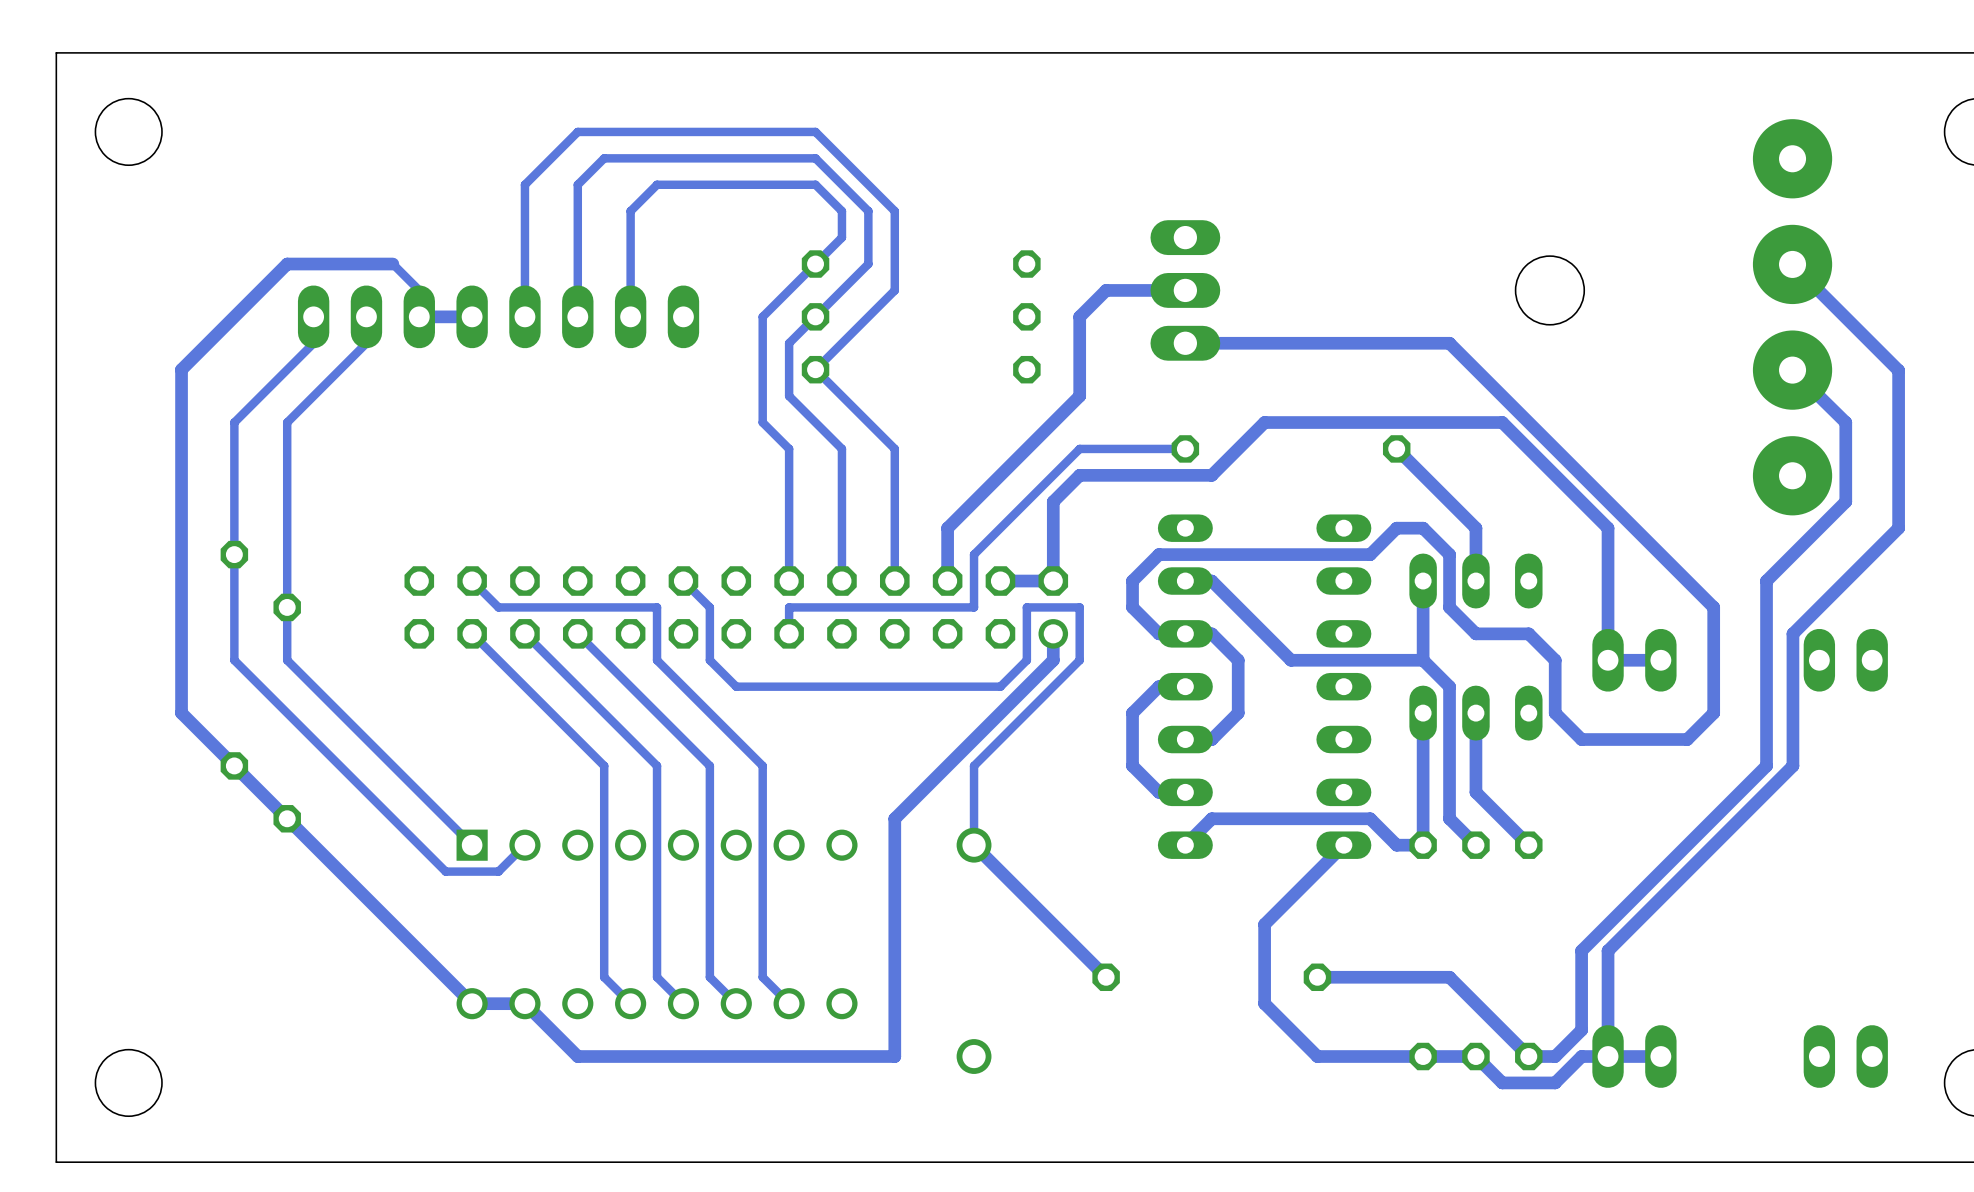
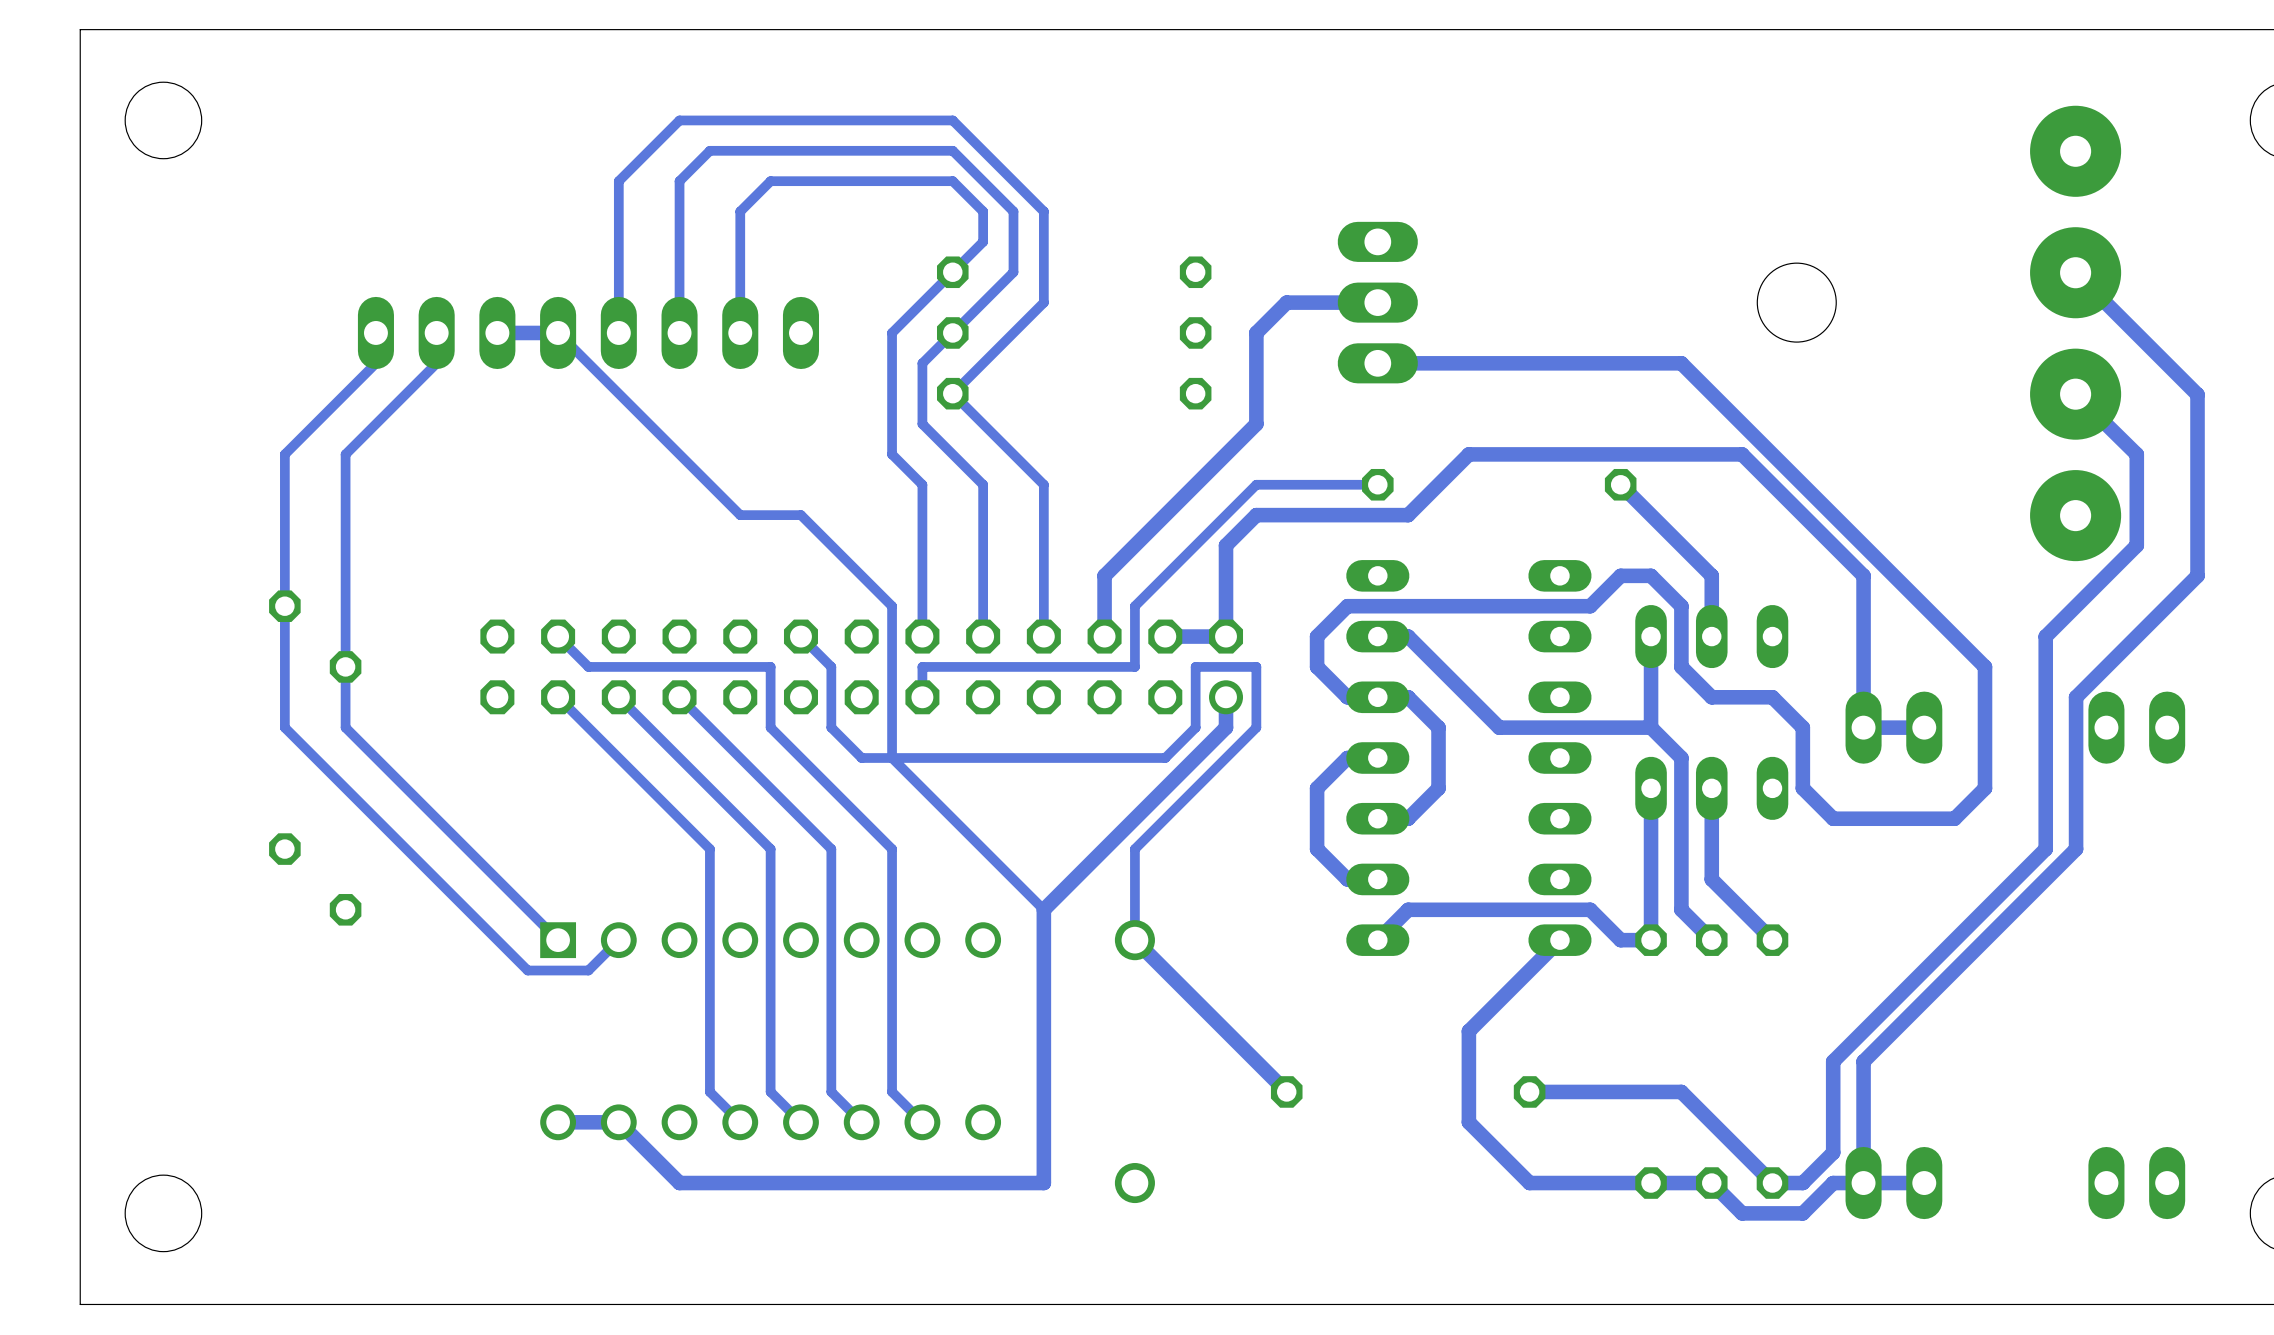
bottom track: (419, 290) (392, 264) (287, 264) (181, 369) (181, 713) (472, 1003) -> none
bottom track: none -> (558, 332) (740, 515) (800, 515) (892, 606) (892, 758) (1043, 909)

